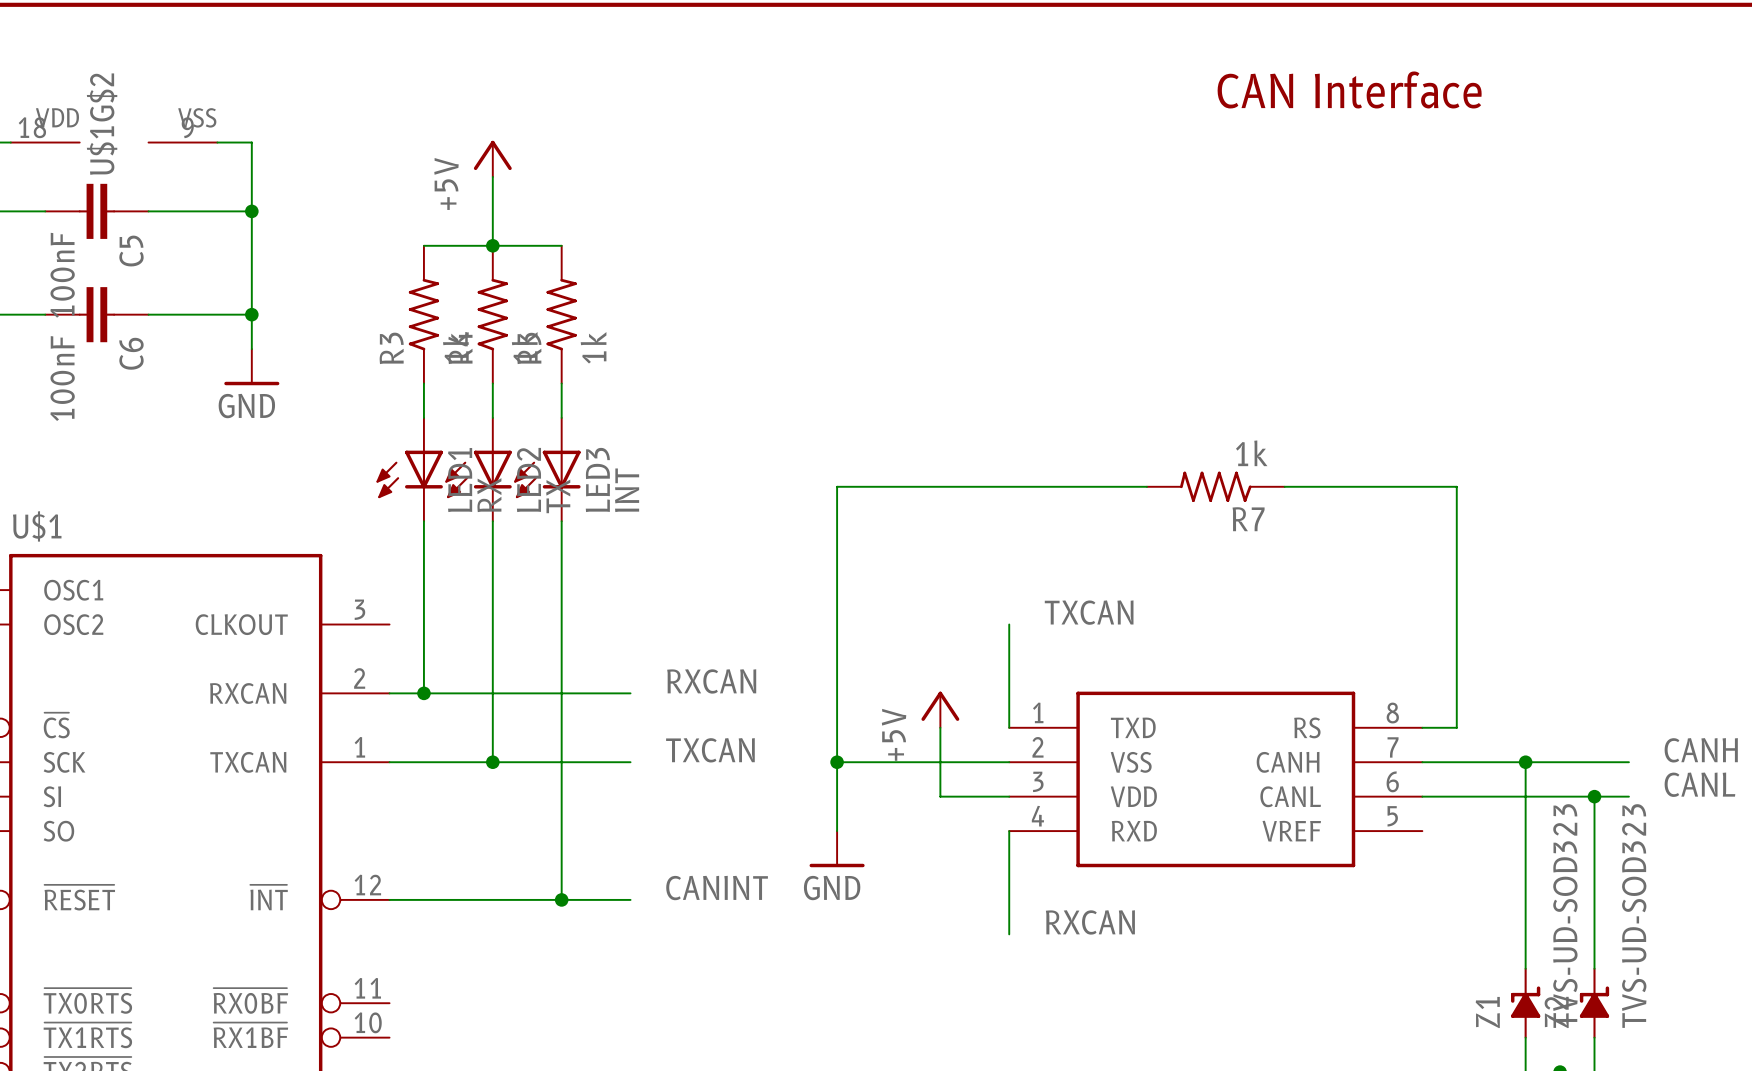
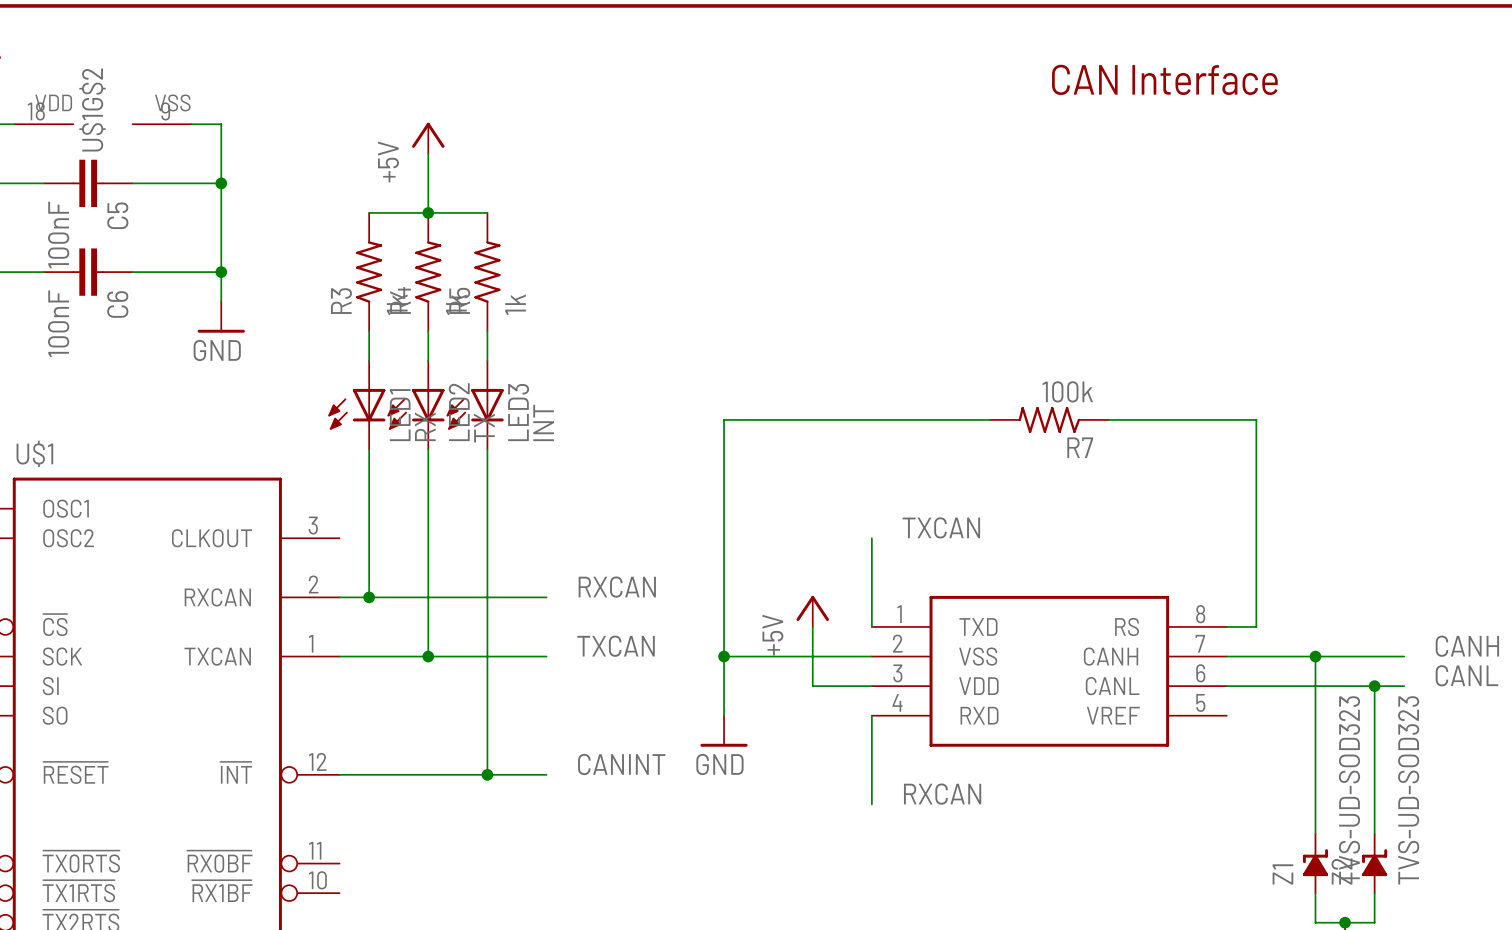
R7 value: 1k (1251, 453) -> 100k (1067, 391)

